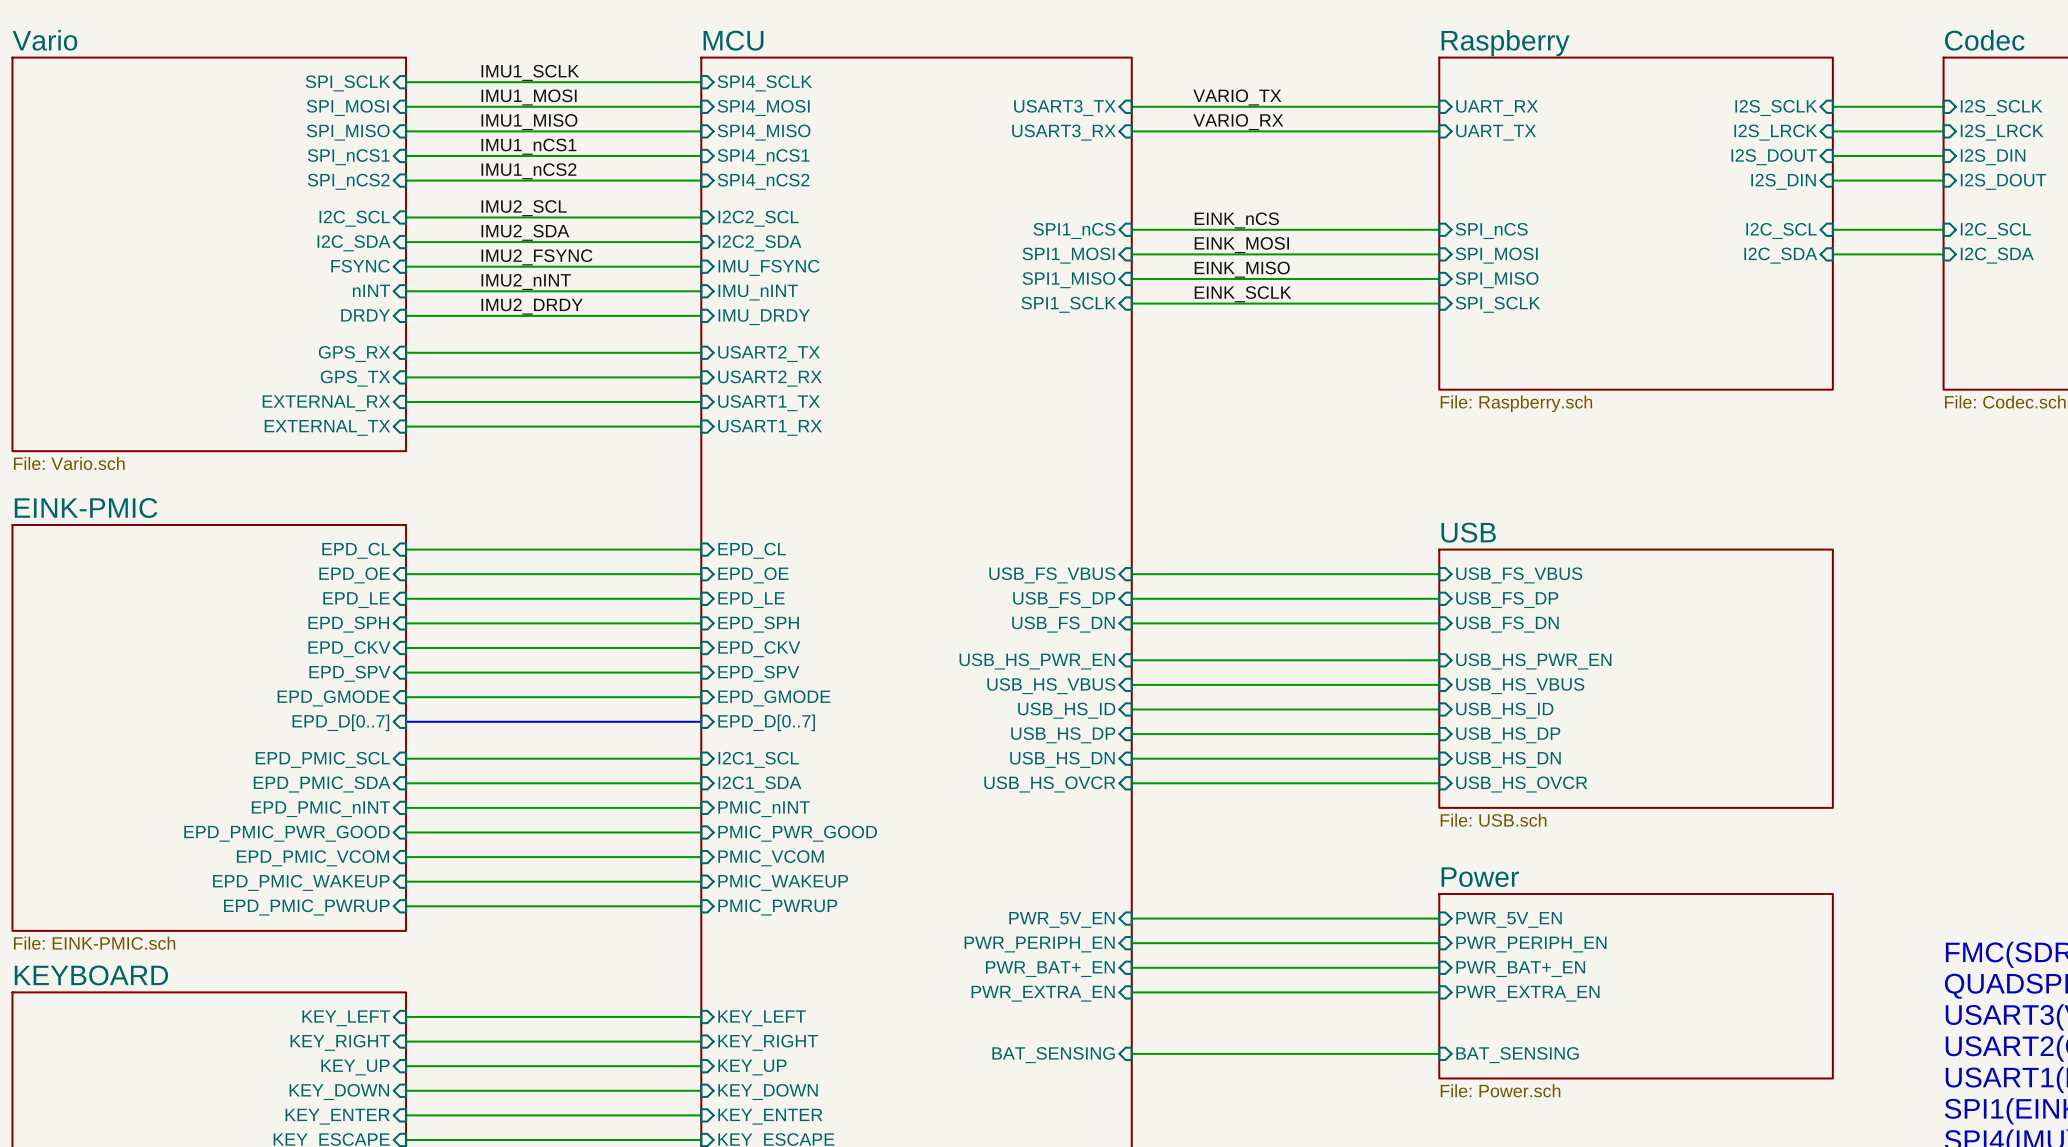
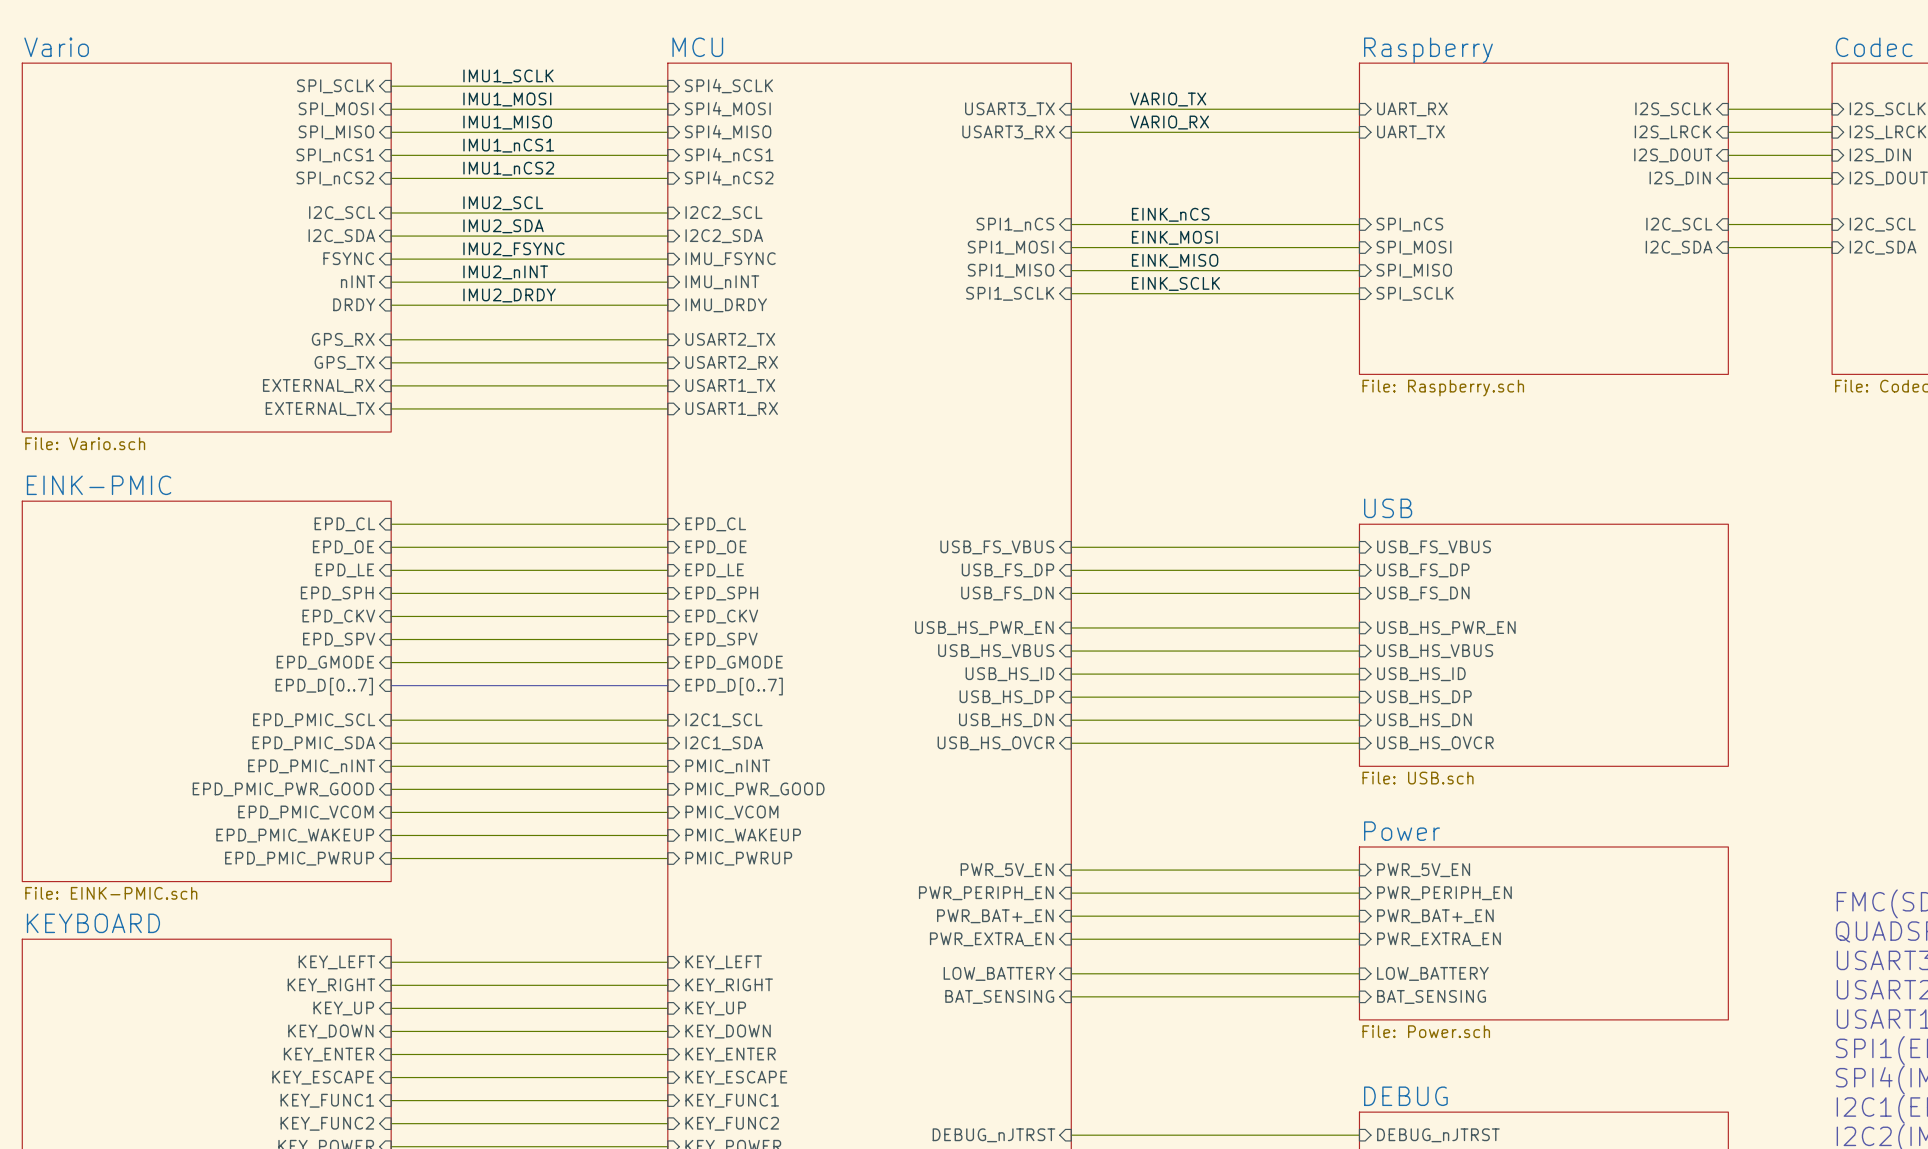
wire: none -> (1071, 973) (1359, 973)
sheet pin: none -> LOW_BATTERY (999, 973)
sheet pin: none -> LOW_BATTERY (1432, 973)

